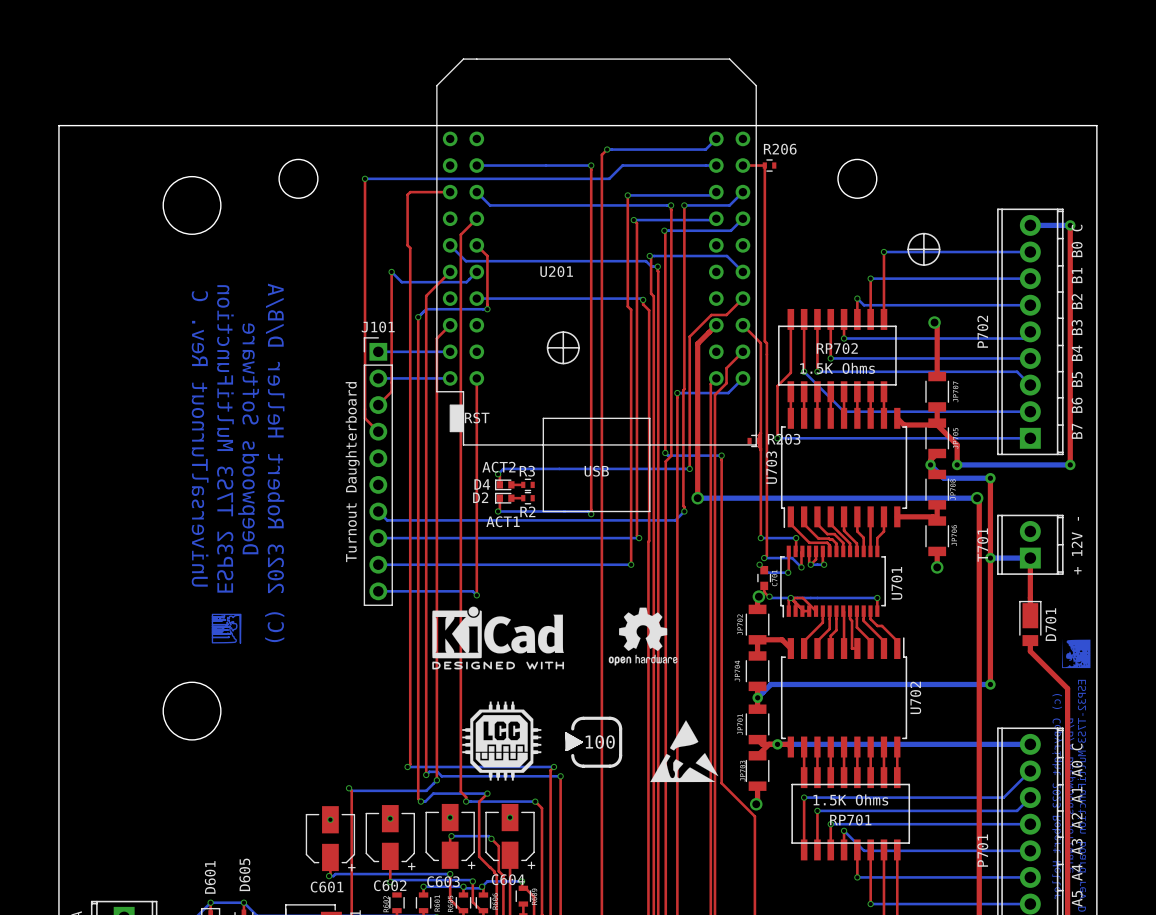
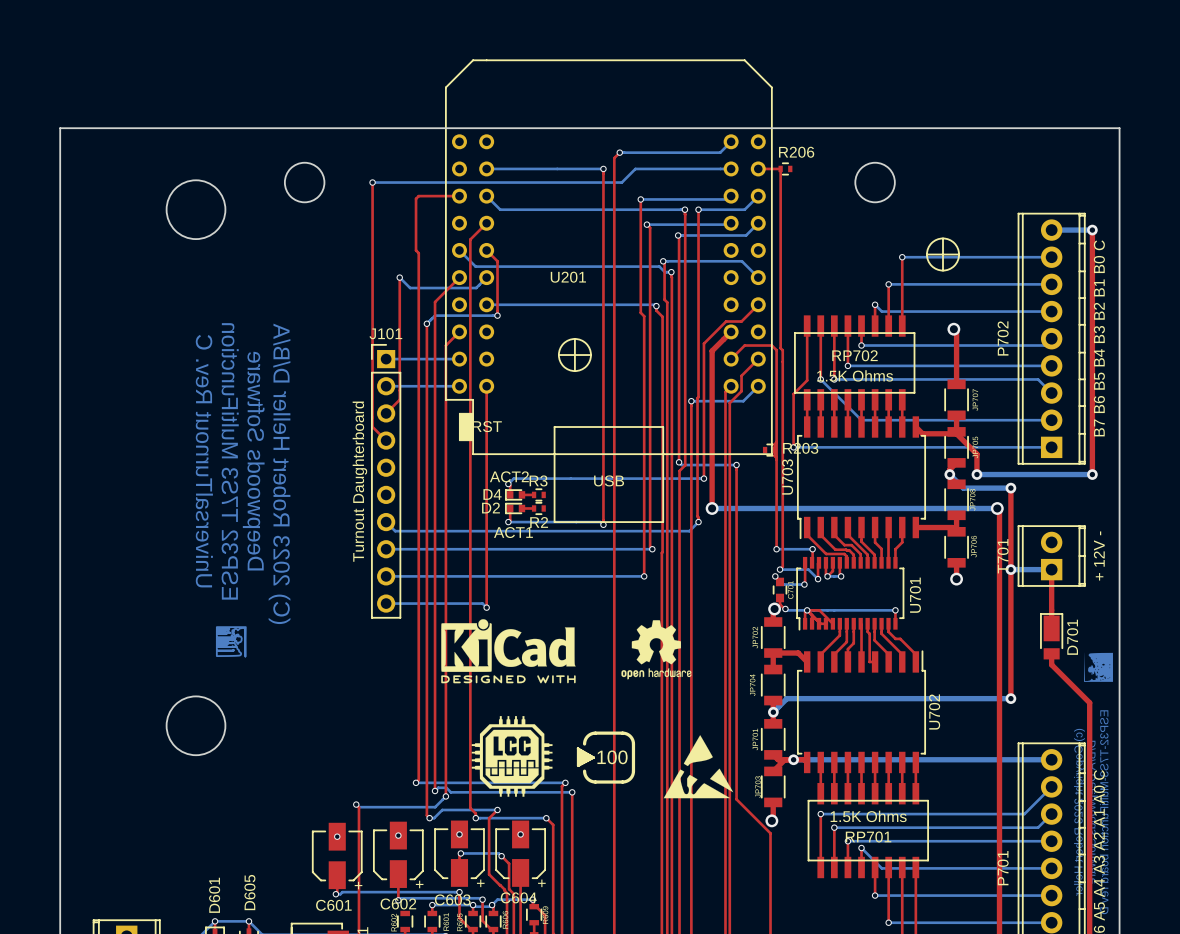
top track: (742, 325) (756, 338) -> (731, 359) (744, 345) (771, 345)

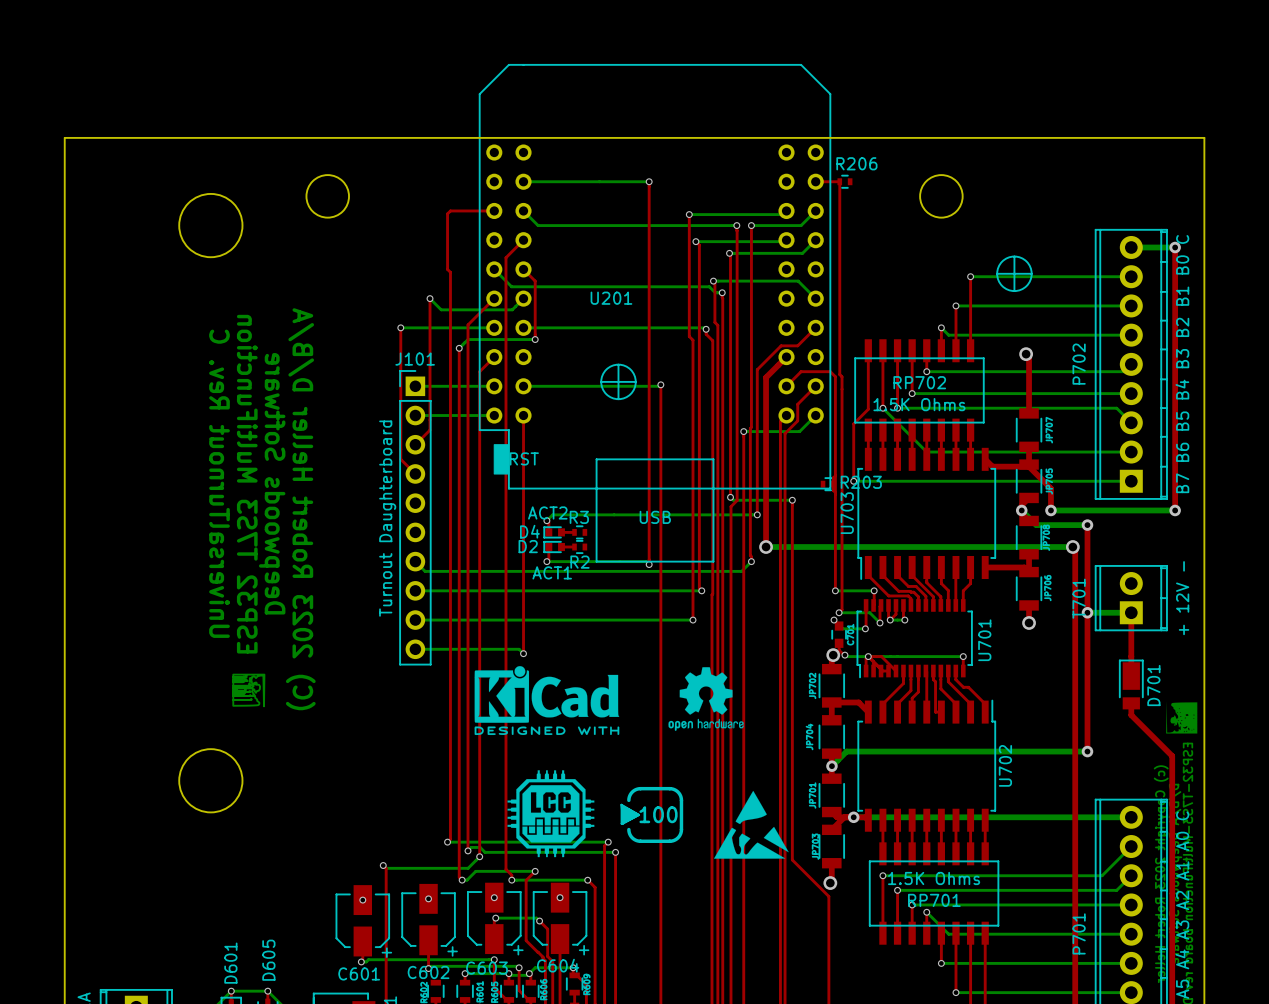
bottom track: (731, 141) (720, 152) (619, 152) -> none
top track: (619, 152) (614, 158) (614, 357) -> none
via: (619, 152) -> none
bottom track: (731, 168) (635, 168) (621, 182) (372, 182) -> none
top track: (372, 182) (372, 304) -> none
via: (372, 182) -> none
bottom track: none -> (400, 327) (494, 327)
via: none -> (400, 327)
bottom track: none -> (660, 384) (523, 386)
via: none -> (660, 384)

